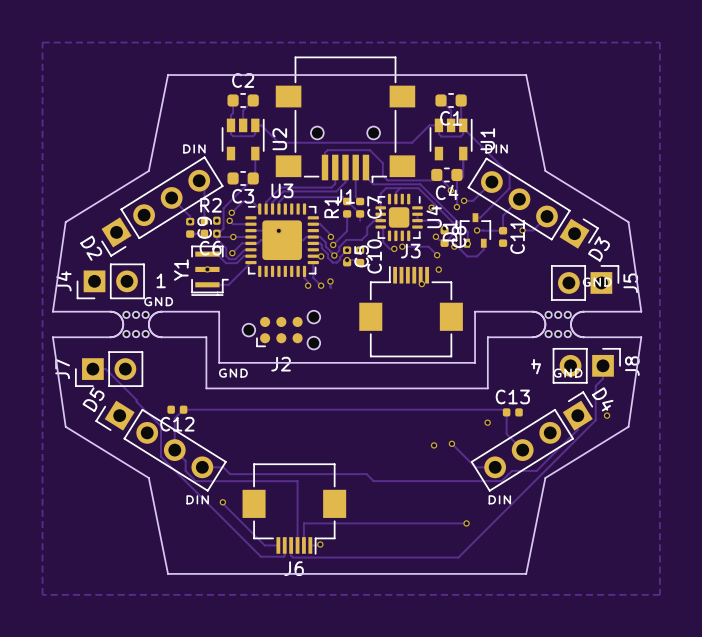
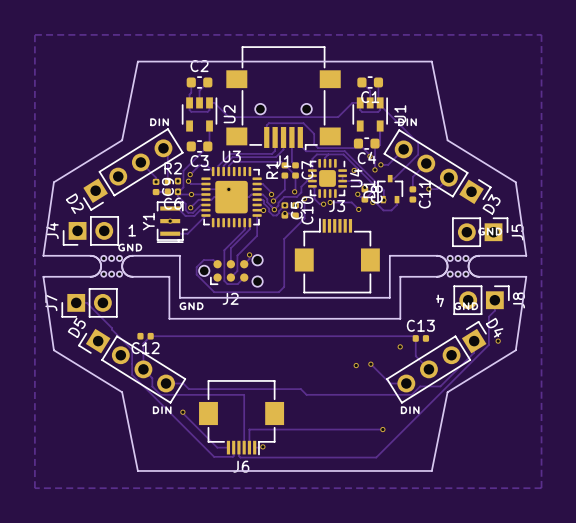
track: none -> (295, 181) (294, 191)
track: (477, 230) (503, 230) -> none
via: (477, 230) -> none
via: none -> (294, 191)
track: none -> (304, 198) (304, 218) (284, 238) (284, 286) (278, 292) (214, 292) (196, 274) (196, 267) (203, 260) (213, 260) (217, 264)
via: none -> (304, 198)
via: (438, 269) -> none
track: none -> (244, 222) (244, 229) (224, 250) (224, 280) (227, 284) (237, 284) (244, 277)
track: (313, 277) (321, 285) -> (257, 228) (257, 235) (237, 255) (237, 271) (230, 277)
track: (304, 278) (308, 281) (308, 285) -> (249, 228) (230, 248) (230, 264)
track: (330, 281) (331, 288) -> none
via: (330, 281) -> none
via: (421, 284) -> none
via: (308, 285) -> none
via: (321, 285) -> none
track: none -> (249, 254) (249, 258) (244, 264)
via: none -> (249, 254)

